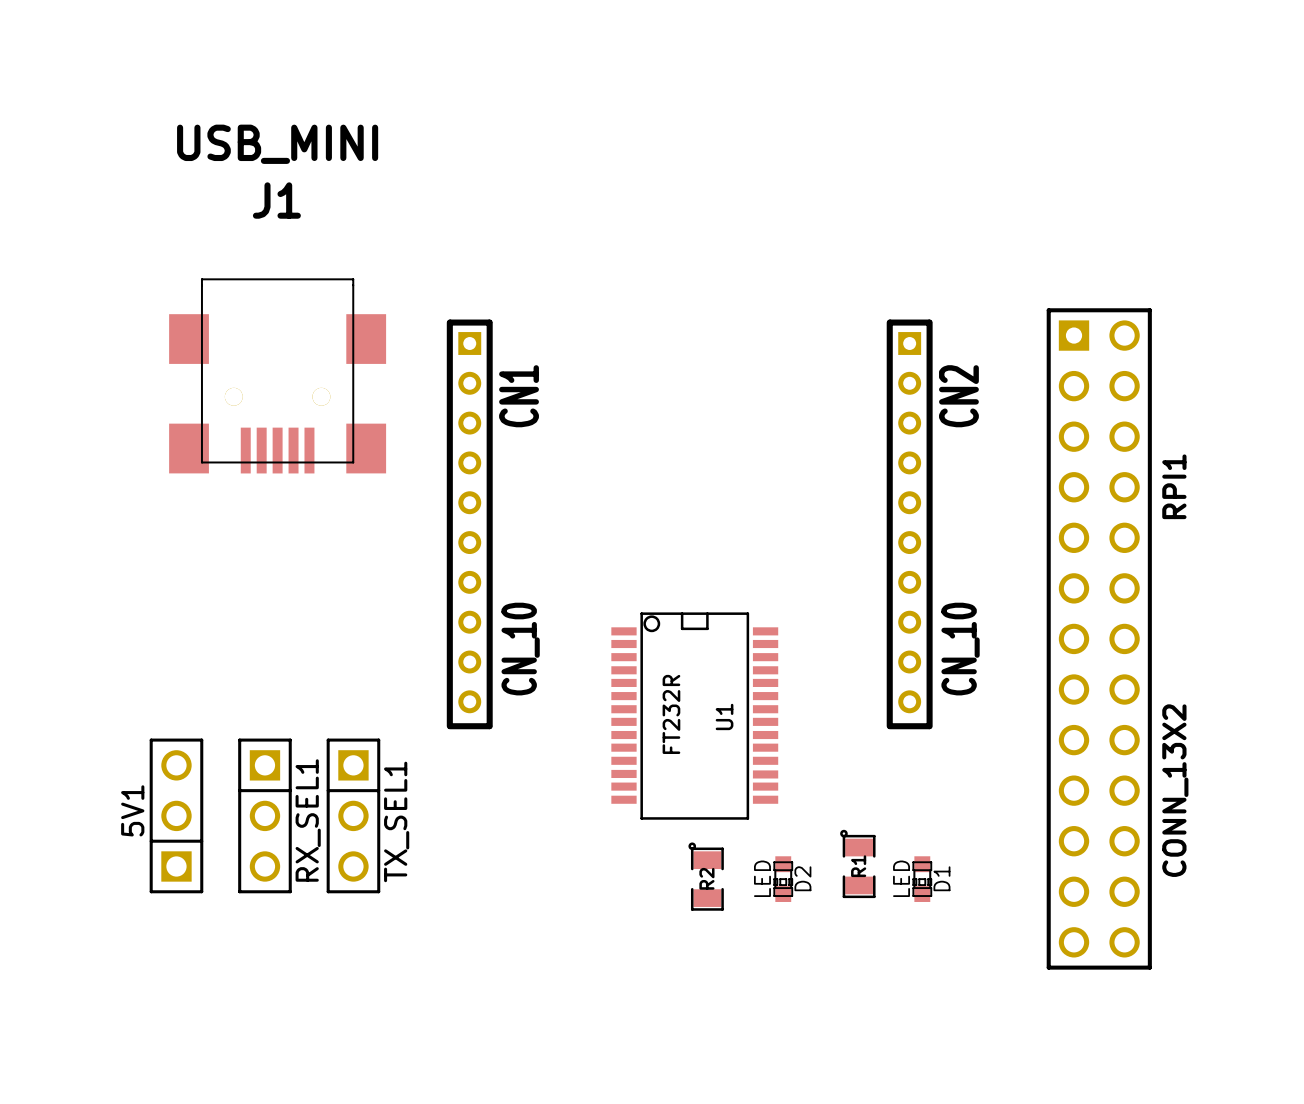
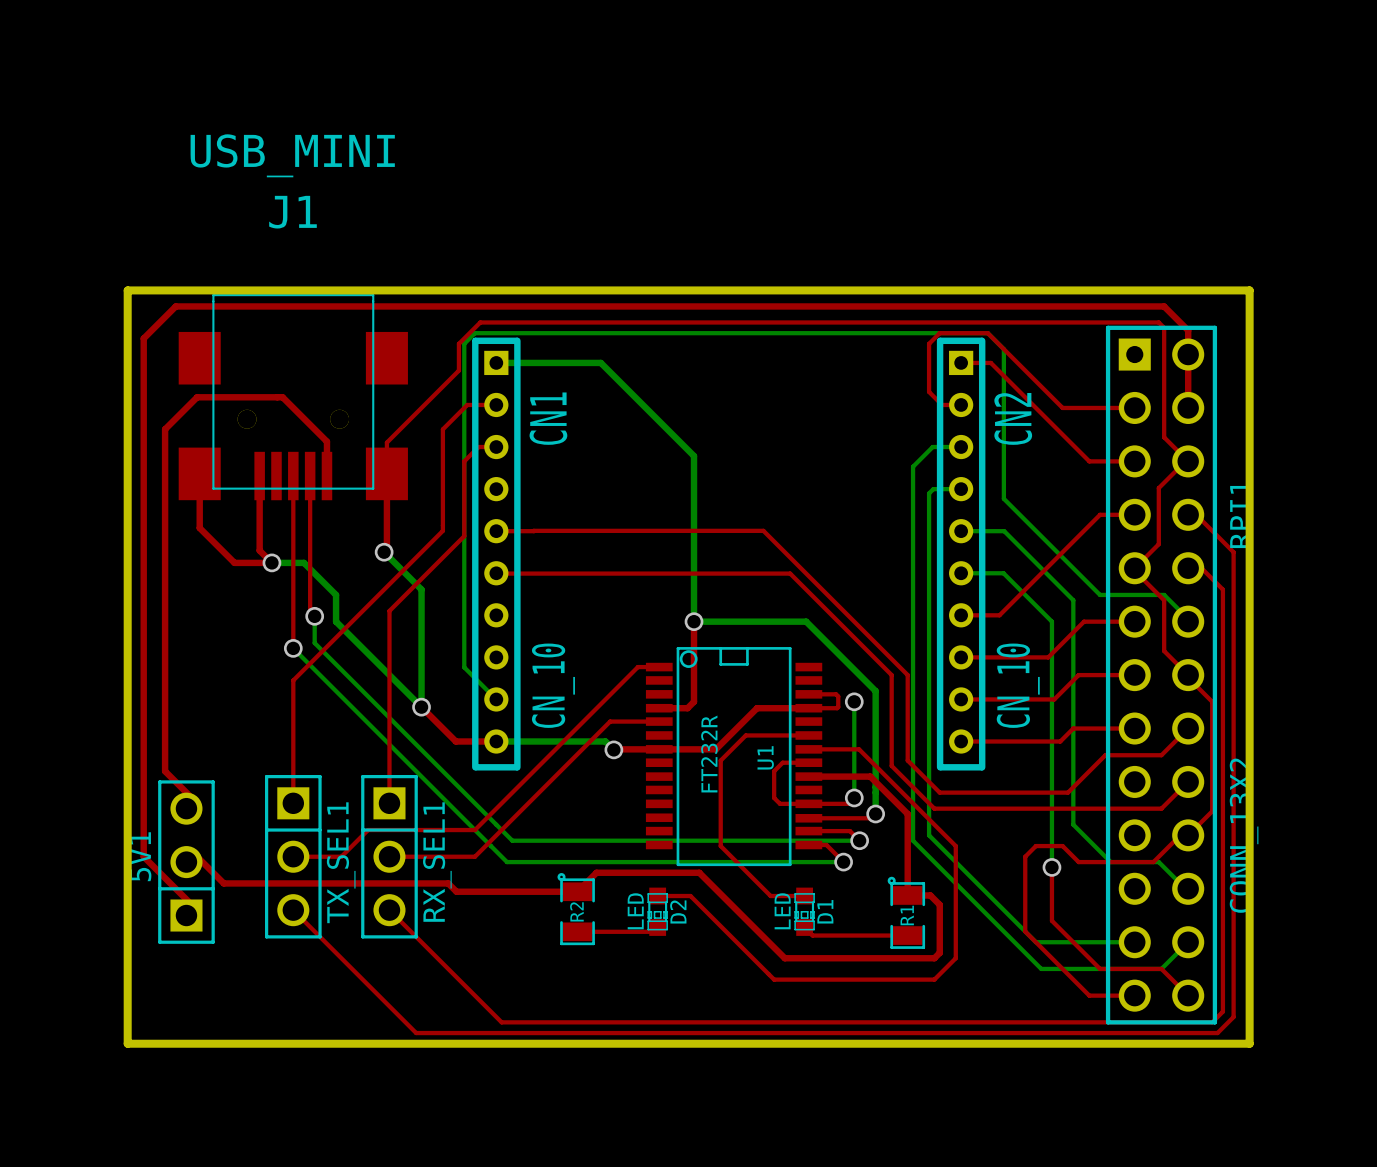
board edge: none -> (127, 290) (127, 1043) (1249, 1043) (1249, 290) (127, 290)
bottom track: none -> (496, 362) (600, 362) (694, 456) (694, 621) (806, 621) (875, 691) (875, 814)
top track: none -> (961, 362) (990, 362) (1089, 461) (1134, 461)
top track: none -> (496, 404) (467, 404) (442, 429) (442, 530) (293, 680) (293, 803)
top track: none -> (961, 404) (942, 404) (929, 391) (929, 343) (939, 333) (987, 333) (1062, 407) (1134, 407)
top track: none -> (1188, 407) (1188, 330) (1164, 306) (175, 306) (143, 338) (143, 856) (197, 910)
top track: none -> (496, 447) (478, 447) (464, 461) (464, 536) (389, 610) (389, 803)
bottom track: none -> (961, 447) (932, 447) (913, 466) (913, 840) (1041, 968) (1161, 968) (1188, 942)
top track: none -> (199, 473) (199, 528) (234, 562) (271, 562) (259, 550) (259, 476)
top track: none -> (293, 476) (293, 648)
top track: none -> (310, 476) (310, 611) (314, 616)
top track: none -> (326, 476) (326, 441) (282, 397) (197, 397) (165, 429) (165, 771) (197, 803)
bottom track: none -> (961, 489) (933, 489) (929, 493) (929, 835) (1035, 942) (1134, 942)
top track: none -> (1134, 514) (1100, 514) (999, 615) (961, 615)
top track: none -> (1188, 514) (1196, 514) (1233, 552) (1233, 1017) (1217, 1033) (416, 1033) (293, 910)
top track: none -> (496, 531) (763, 530) (907, 675) (907, 760) (939, 792) (1067, 792) (1105, 755) (1161, 755) (1188, 728)
bottom track: none -> (961, 531) (1004, 531) (1073, 600) (1073, 824) (1110, 862) (1158, 862) (1185, 888) (1188, 888)
top track: none -> (384, 552) (386, 549) (386, 442) (458, 370) (458, 343) (480, 322) (1158, 322) (1164, 327) (1164, 437) (1188, 461) (1185, 461) (1158, 488) (1158, 544) (1134, 568) (1134, 570) (1164, 600) (1164, 651) (1212, 701) (1212, 811) (1188, 835) (1180, 835) (1153, 862) (1078, 862) (1062, 846) (1035, 846) (1025, 856) (1025, 931) (1089, 995) (1134, 995)
bottom track: none -> (384, 552) (421, 589) (421, 707) (336, 621) (336, 594) (304, 562) (271, 562)
via: none -> (384, 552)
via: none -> (271, 562)
top track: none -> (1188, 568) (1201, 568) (1222, 589) (1222, 1011) (1212, 1022) (501, 1022) (389, 910)
top track: none -> (496, 573) (790, 573) (891, 675) (891, 765) (934, 808) (1161, 808) (1188, 781)
bottom track: none -> (961, 573) (1003, 573) (1051, 621) (1051, 867)
bottom track: none -> (314, 616) (314, 643) (512, 840) (859, 840)
via: none -> (314, 616)
top track: none -> (694, 621) (694, 701) (687, 708) (659, 708)
via: none -> (694, 621)
top track: none -> (1134, 621) (1084, 621) (1048, 657) (961, 657)
bottom track: none -> (1188, 621) (1188, 619) (1164, 594) (1100, 594) (1003, 498) (1003, 349) (987, 333) (474, 333) (464, 343) (464, 667) (496, 699)
bottom track: none -> (293, 648) (507, 862) (843, 862)
via: none -> (293, 648)
top track: none -> (659, 667) (637, 667) (474, 830) (368, 830) (341, 856) (293, 856)
top track: none -> (1134, 675) (1078, 675) (1054, 699) (961, 699)
top track: none -> (808, 694) (836, 694) (838, 696) (838, 707) (757, 708) (715, 749) (613, 749)
bottom track: none -> (854, 701) (854, 797)
via: none -> (854, 701)
top track: none -> (421, 707) (455, 741) (496, 741)
via: none -> (421, 707)
top track: none -> (659, 721) (610, 721) (474, 856) (389, 856)
top track: none -> (1134, 728) (1073, 728) (1060, 741) (961, 741)
top track: none -> (808, 735) (745, 735) (720, 760) (720, 846) (770, 896) (804, 896)
bottom track: none -> (496, 741) (605, 741) (613, 749)
via: none -> (613, 749)
top track: none -> (808, 749) (859, 749) (955, 846) (955, 958) (934, 979) (774, 979) (690, 896) (657, 896)
top track: none -> (808, 762) (782, 762) (774, 771) (774, 797) (780, 803) (848, 803) (854, 797)
top track: none -> (808, 776) (870, 776) (907, 814) (907, 895) (930, 895) (939, 904) (939, 952) (934, 958) (784, 958) (699, 872) (596, 872) (577, 891) (456, 891) (448, 883) (223, 883) (197, 856)
via: none -> (854, 797)
top track: none -> (875, 814) (871, 818) (808, 818)
via: none -> (875, 814)
top track: none -> (808, 831) (850, 831) (859, 840)
via: none -> (859, 840)
top track: none -> (808, 844) (826, 844) (843, 862)
RX_SEL1 position: (264, 815) -> (389, 856)
TX_SEL1 position: (353, 815) -> (293, 856)
via: none -> (843, 862)
top track: none -> (1051, 867) (1051, 920) (1100, 968) (1161, 968) (1188, 995)
via: none -> (1051, 867)
R2 position: (706, 876) -> (576, 909)
top track: none -> (657, 927) (653, 931) (577, 931)
top track: none -> (804, 927) (812, 935) (907, 935)
D2 position: (783, 879) -> (657, 911)
D1 position: (922, 879) -> (804, 911)

